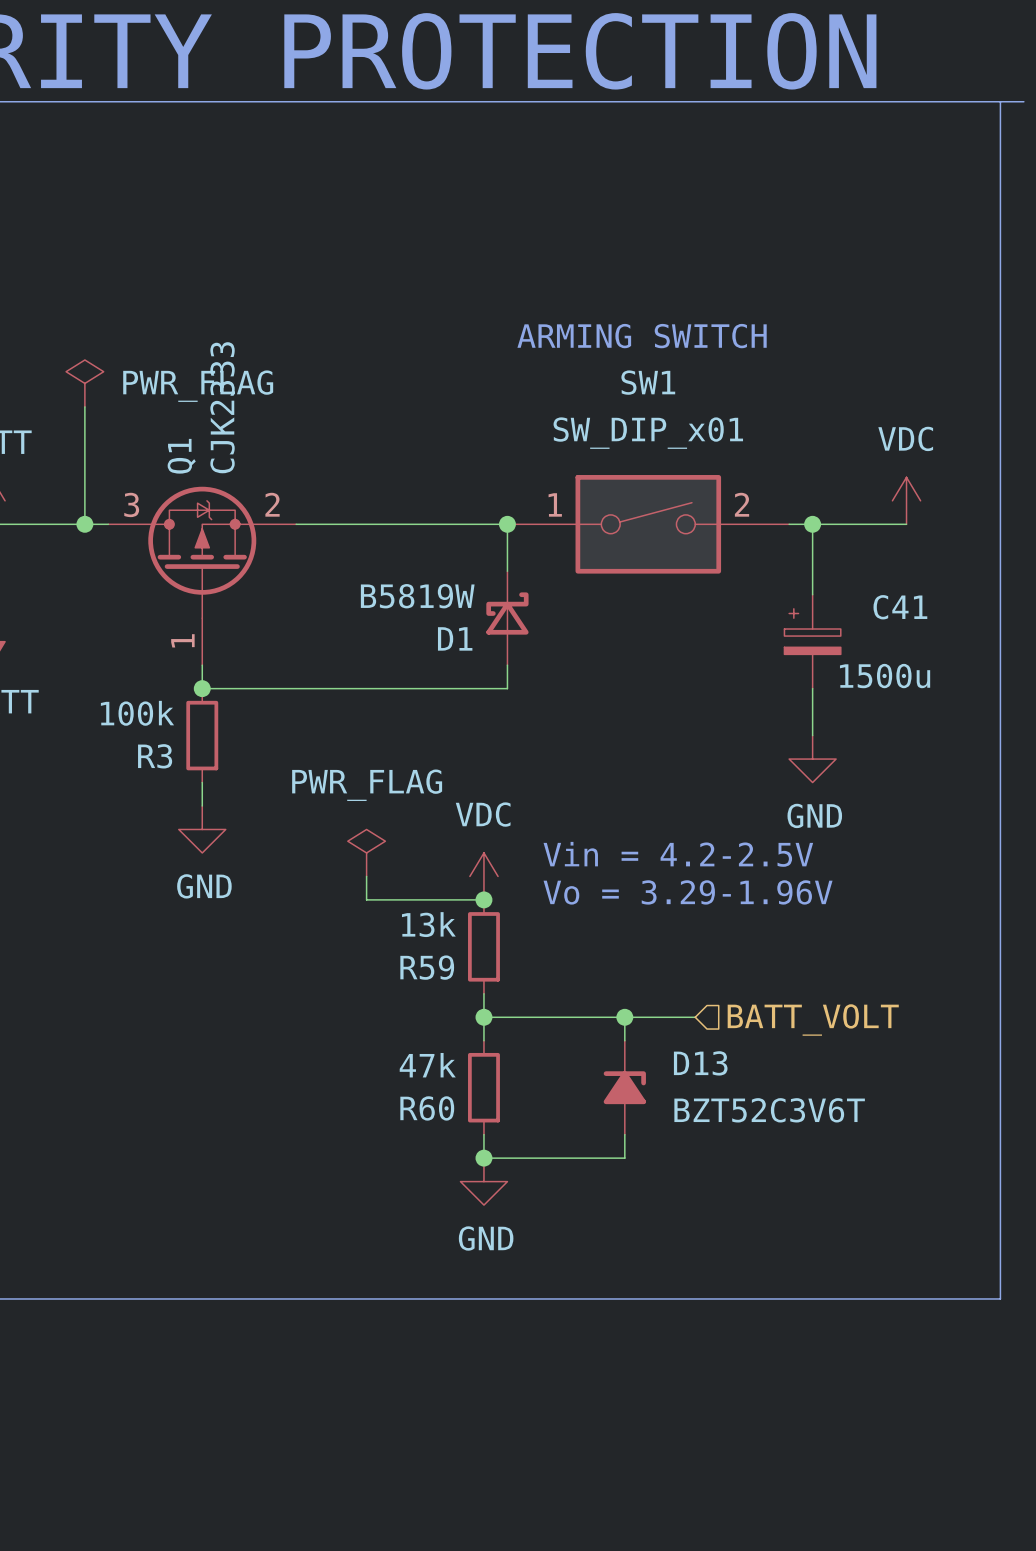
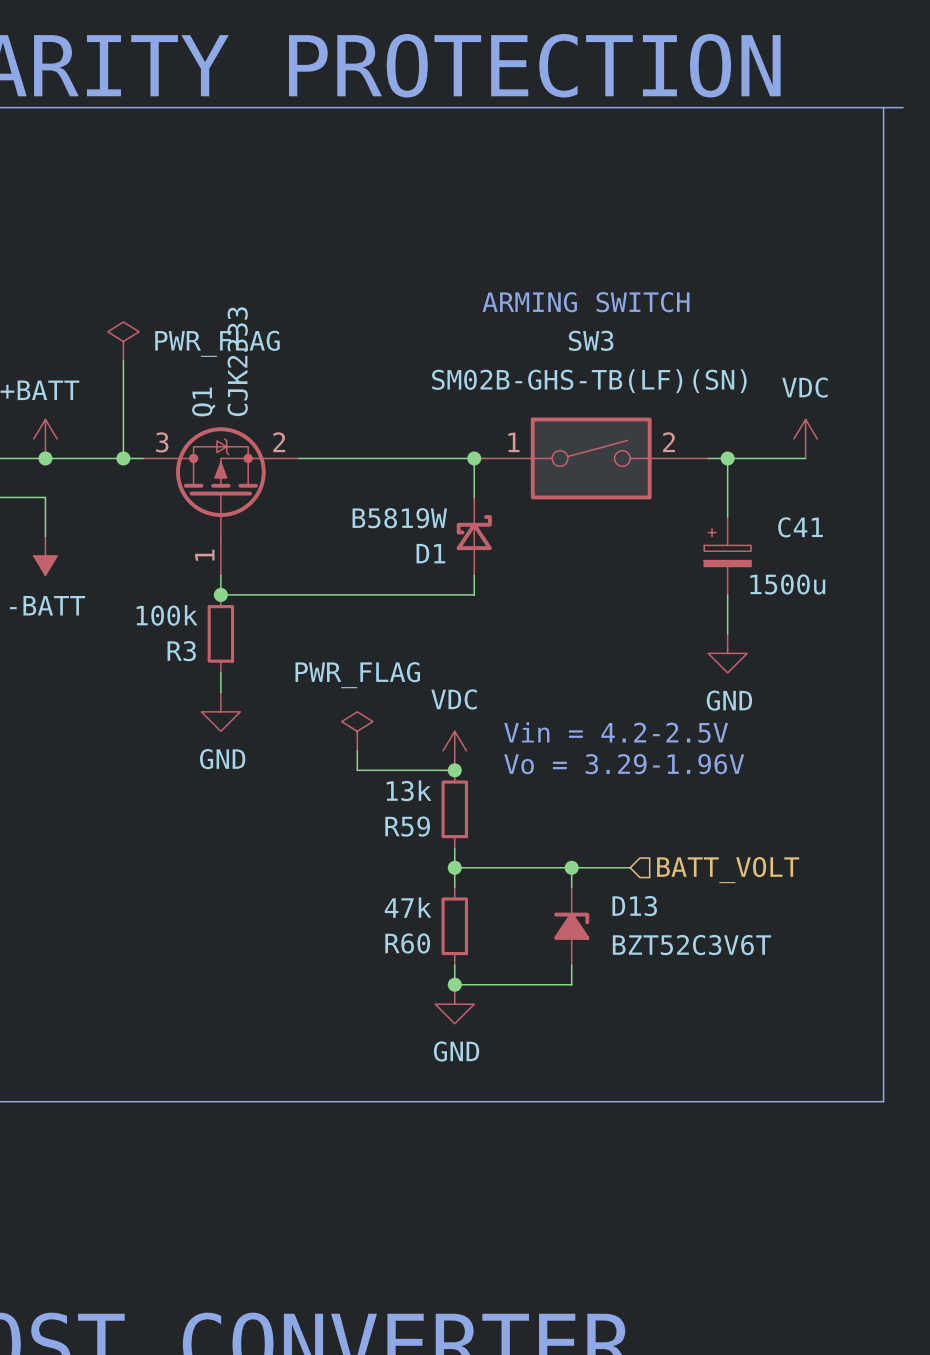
SW1 name: SW1 (648, 382) -> SW3 (591, 340)
SW1 value: SW_DIP_x01 (648, 433) -> SM02B-GHS-TB(LF)(SN) (589, 381)

